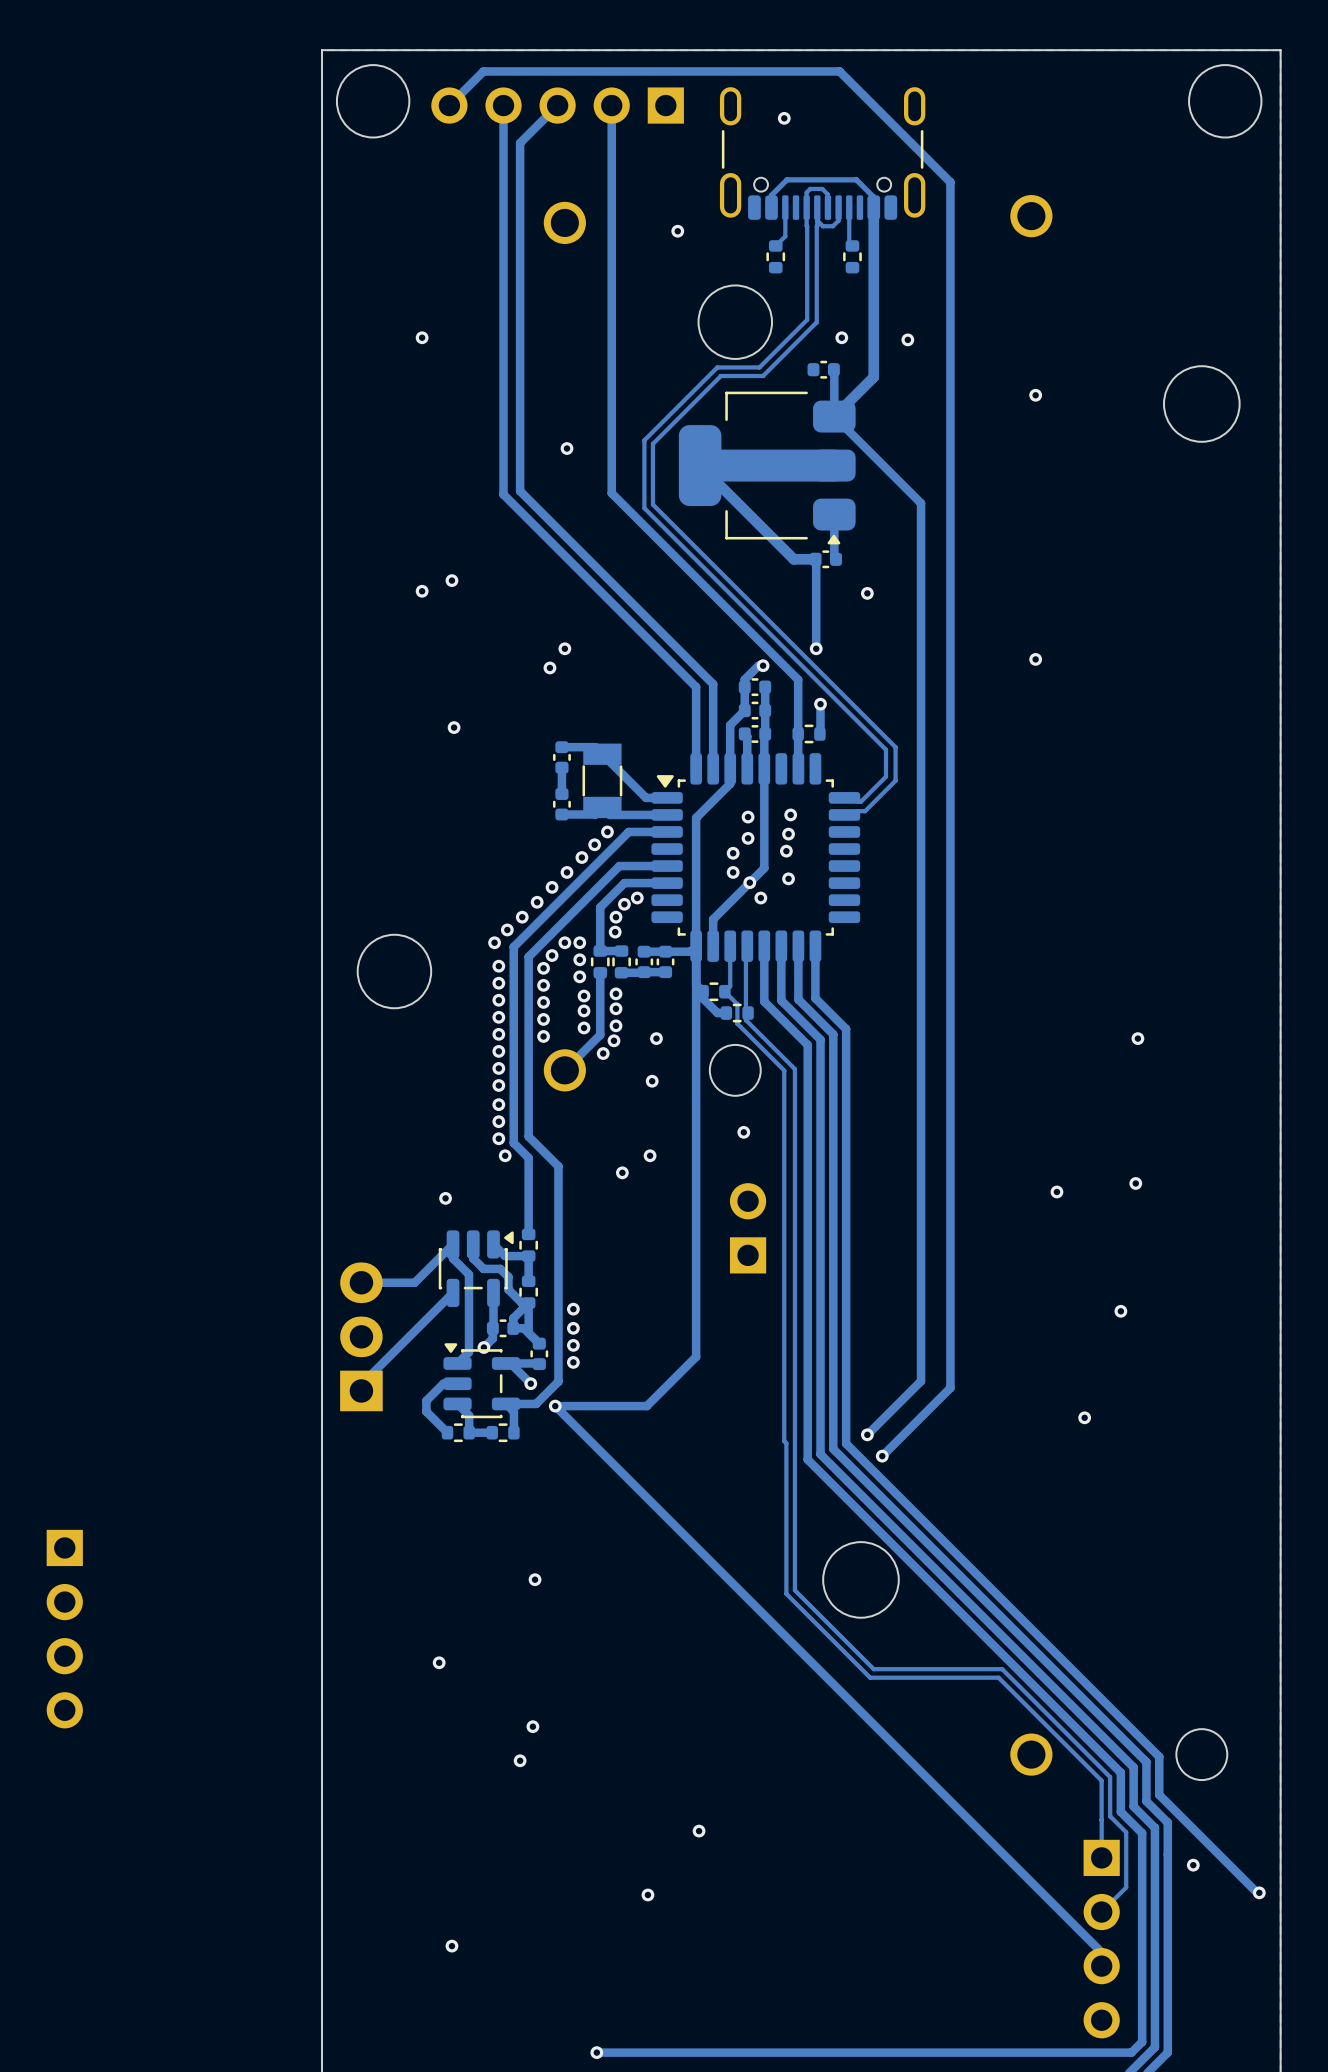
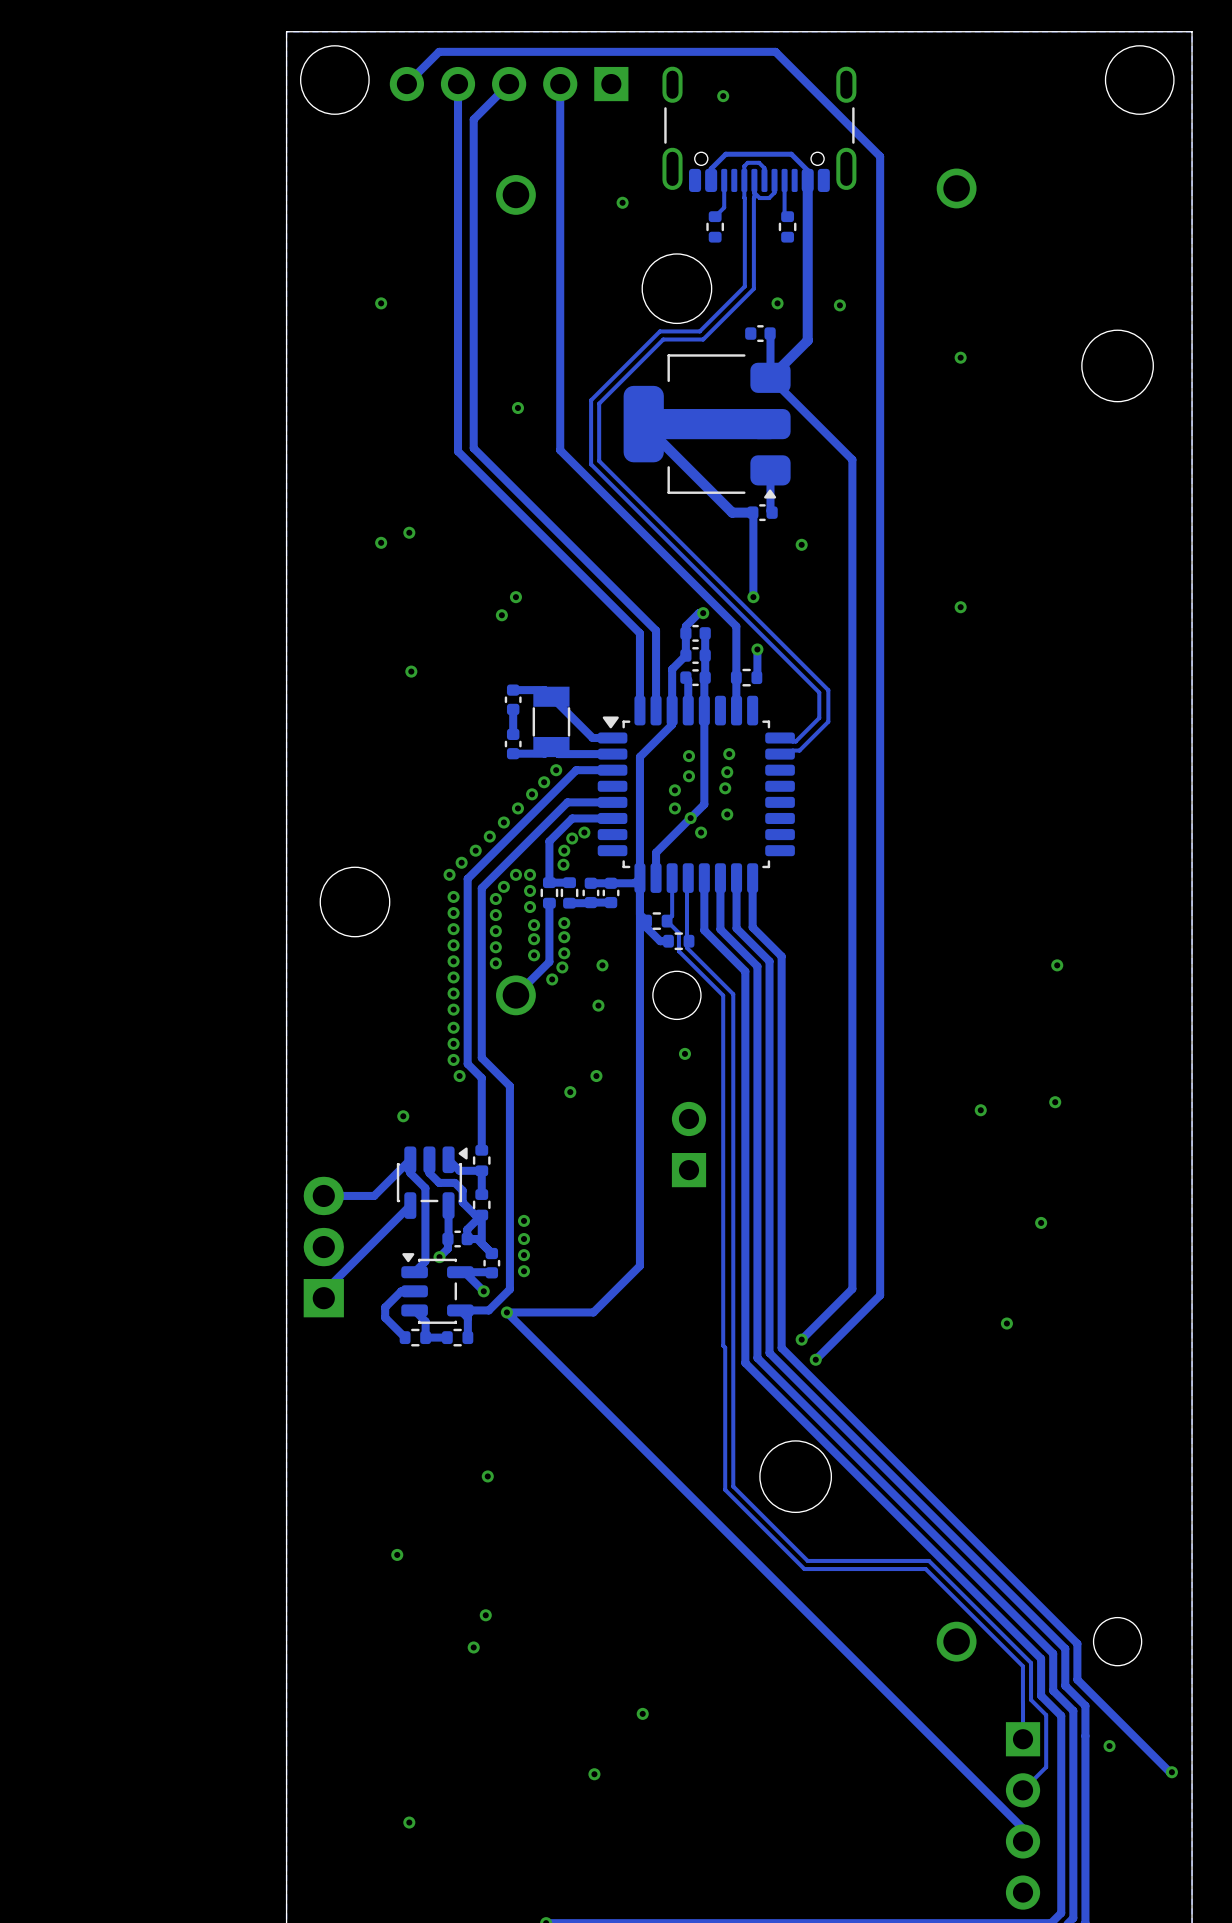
part: (64, 1629) -> none

